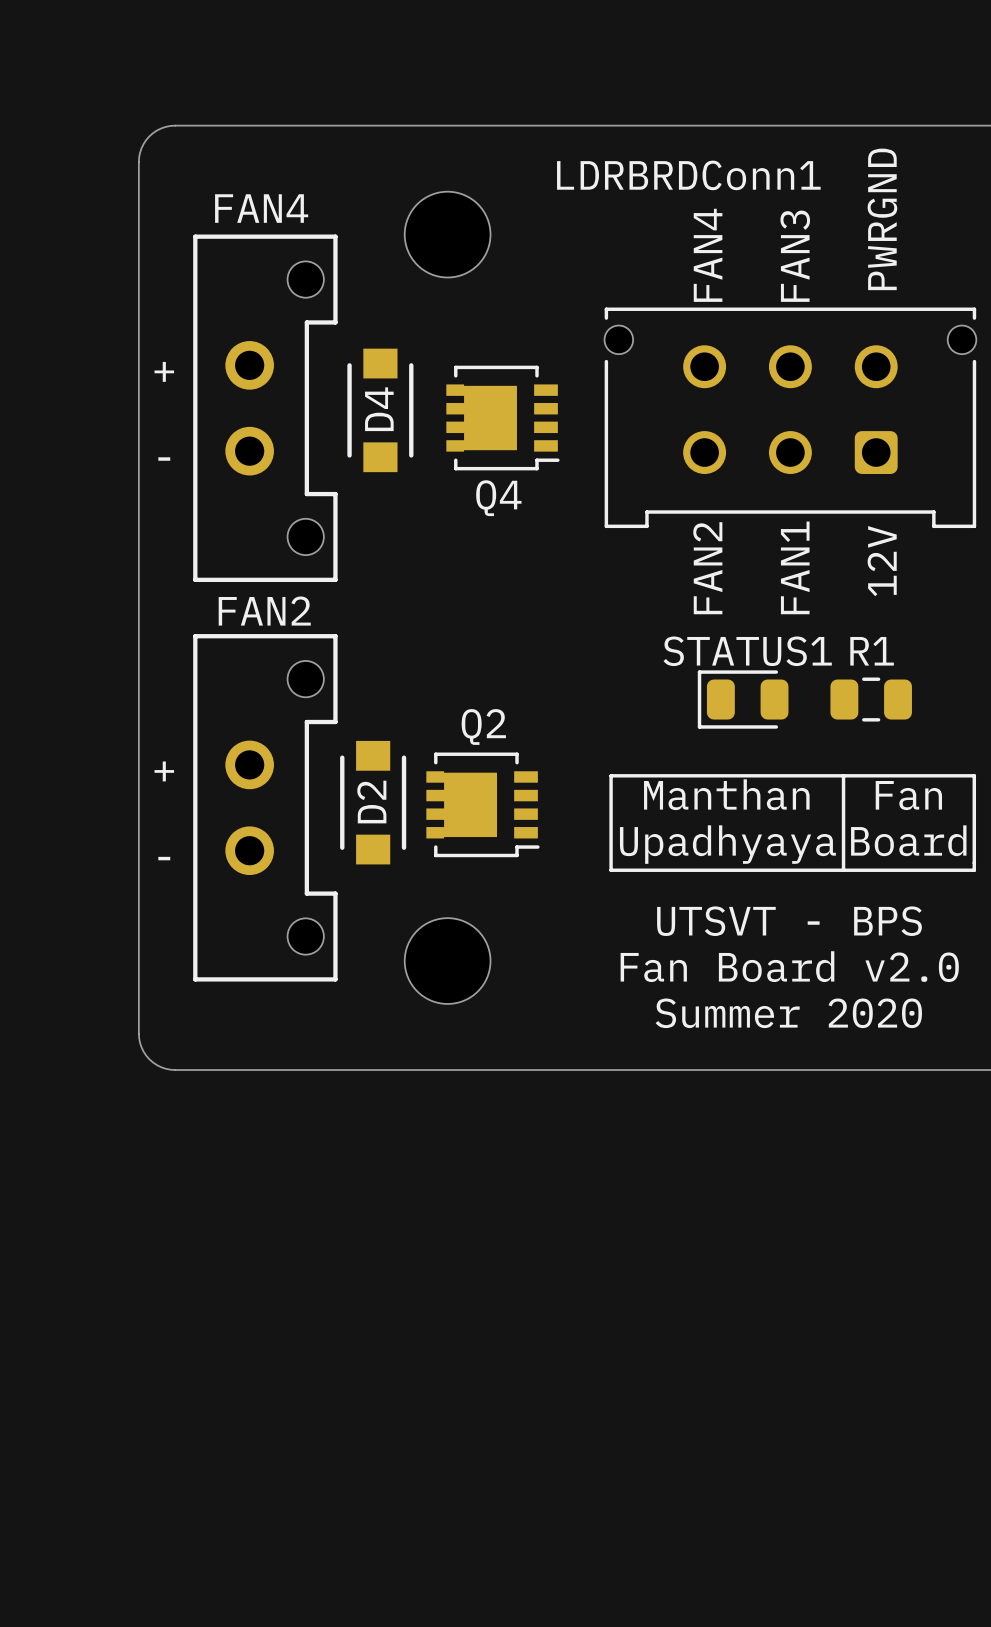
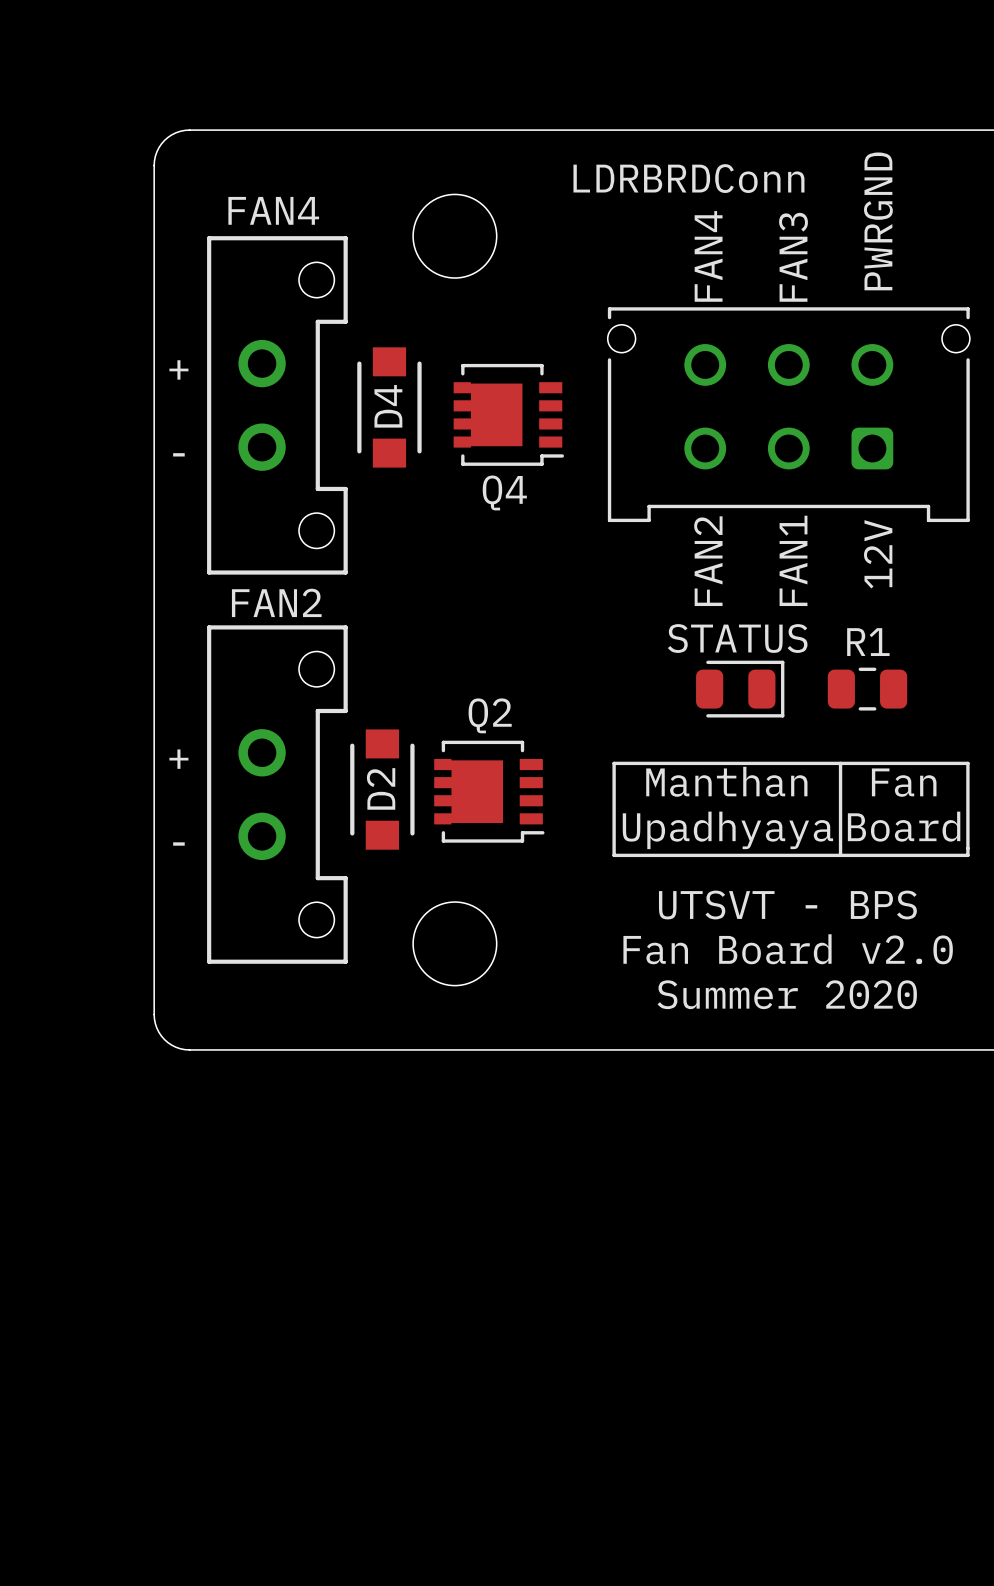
LDRBRDConn1 name: LDRBRDConn1 (688, 175) -> LDRBRDConn (688, 178)
STATUS: none -> (740, 689)
STATUS1: (743, 699) -> none

